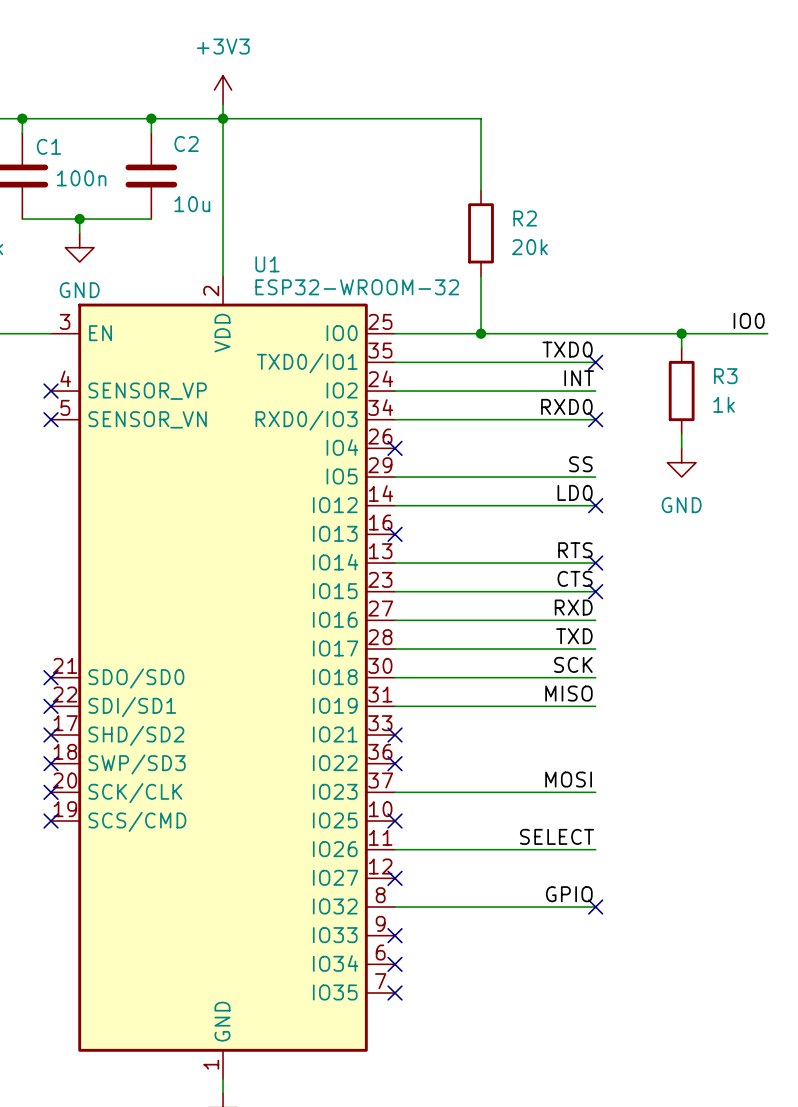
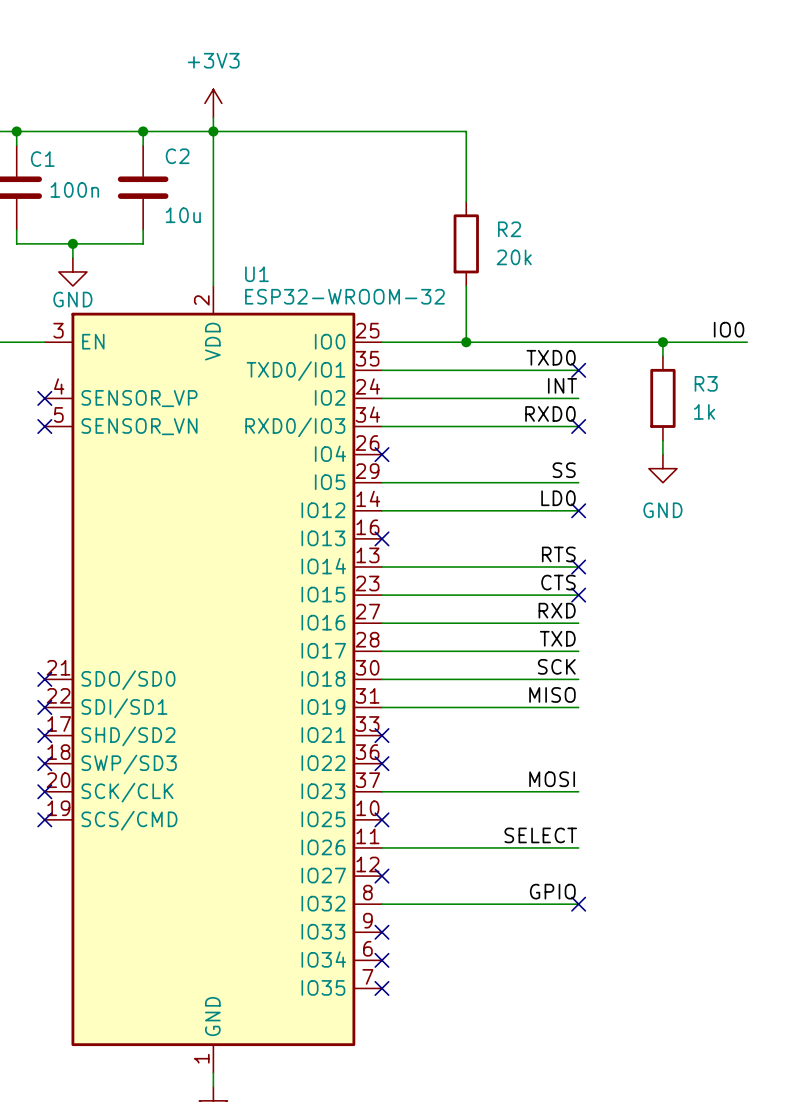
wire: (22, 219) (151, 219) -> (16, 229) (16, 243) (143, 243) (143, 229)
junction position: (79, 219) -> (72, 243)
power symbol position: GND (79, 247) -> GND (72, 271)

